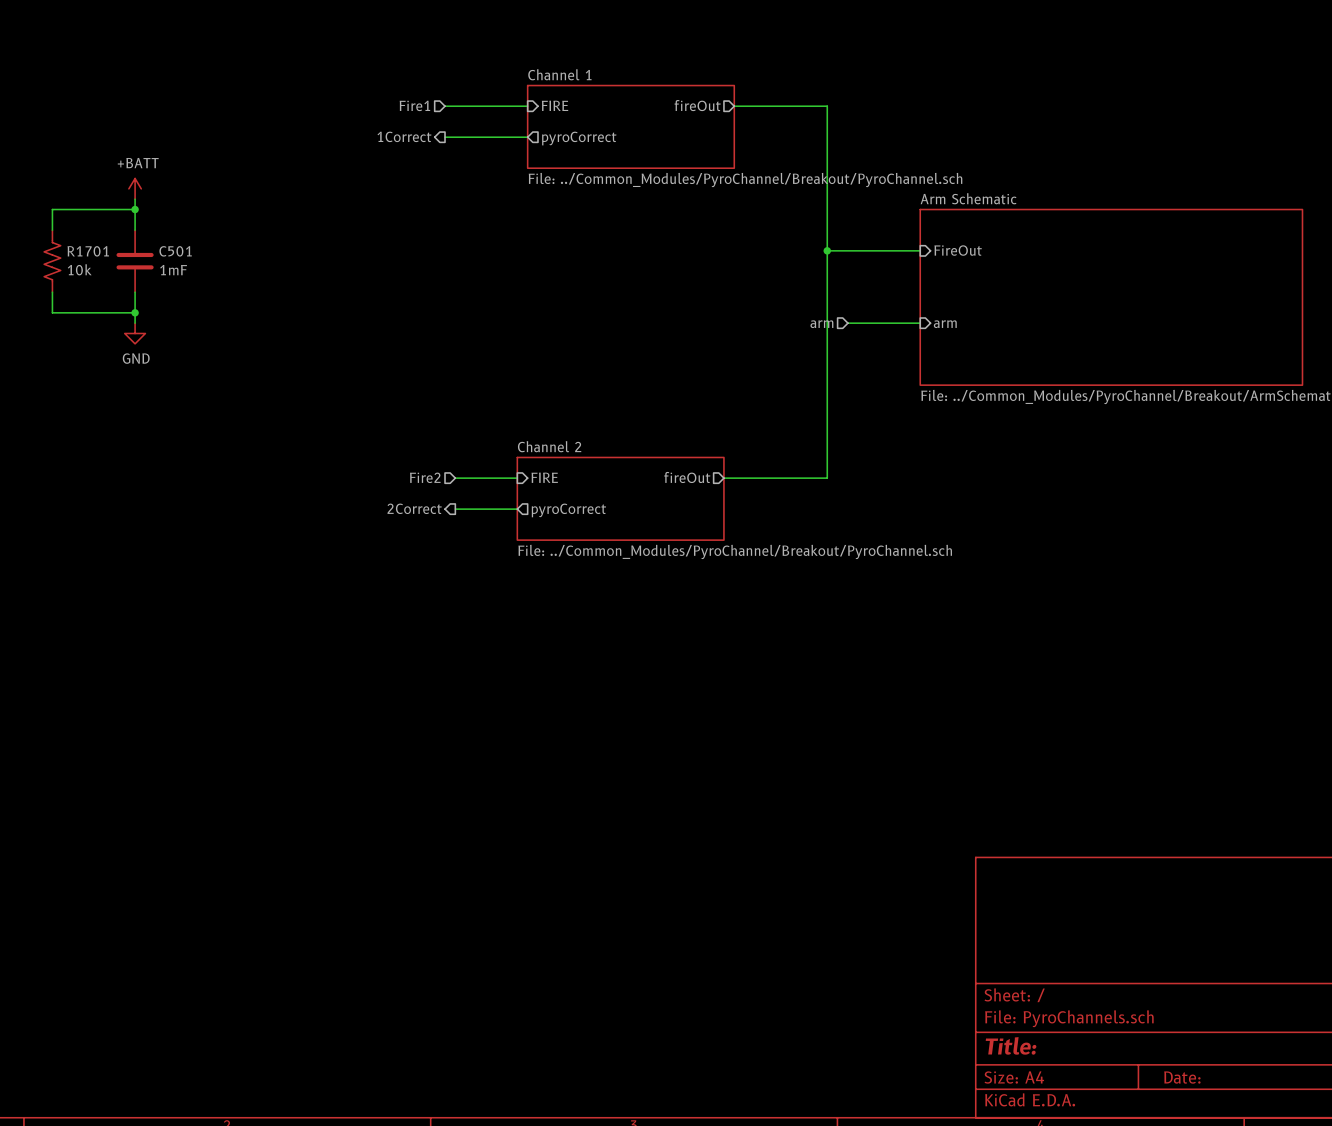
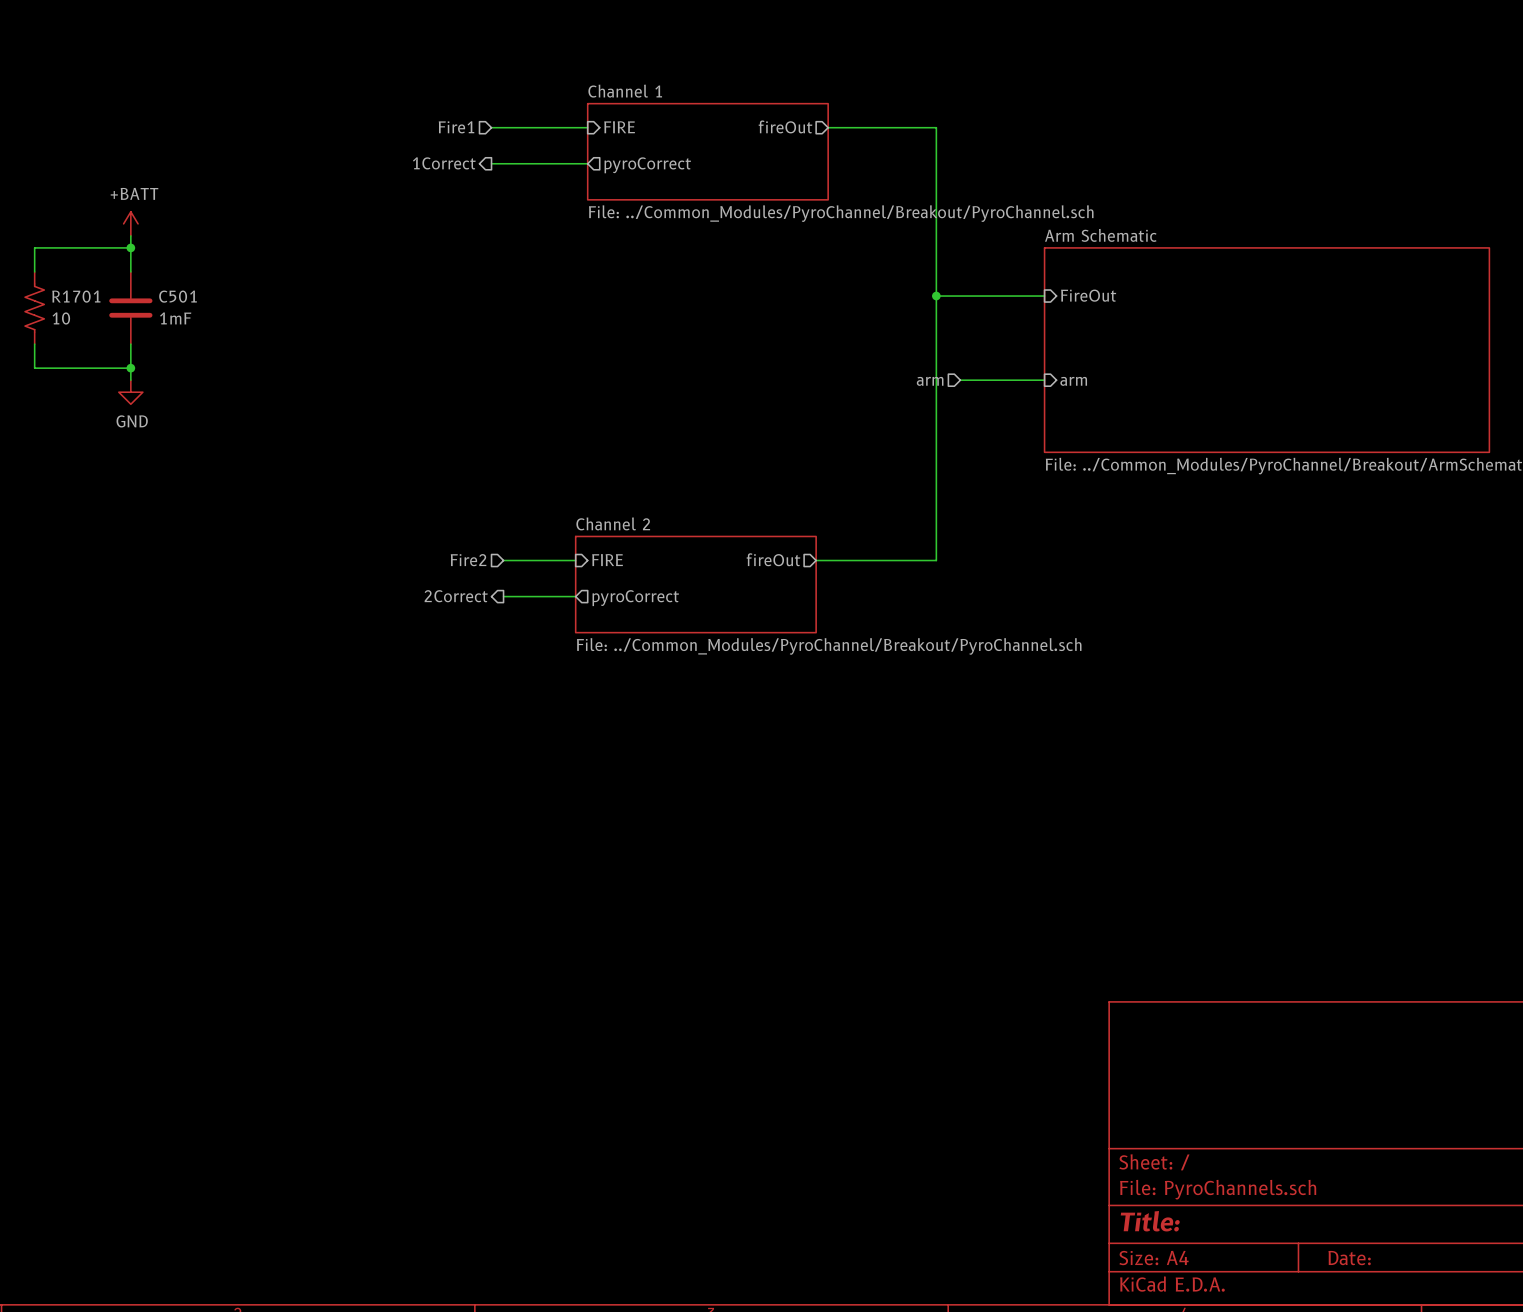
R1701 value: 10k (79, 269) -> 10 (61, 318)

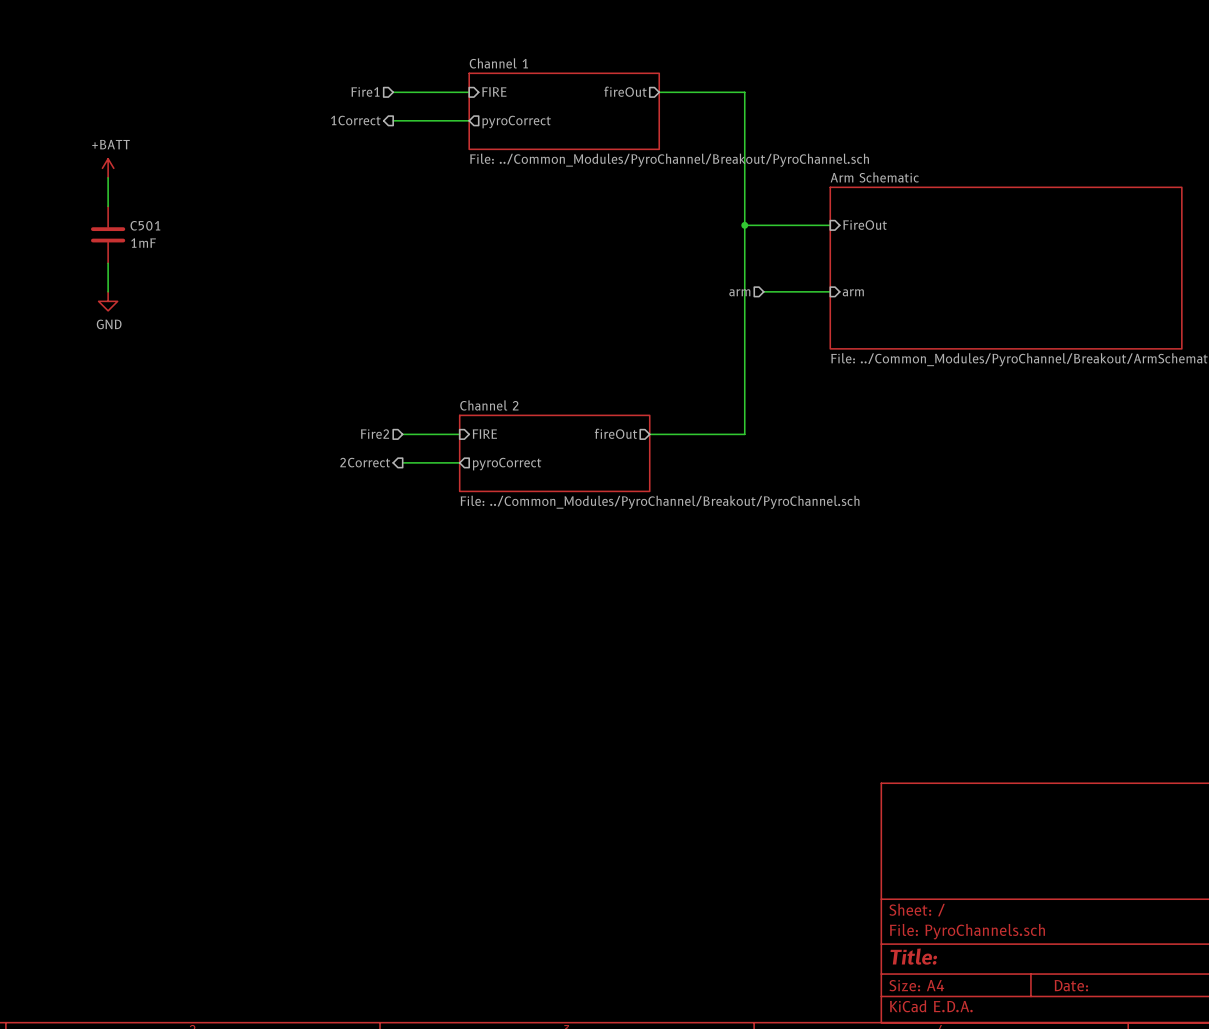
wire: (130, 247) (34, 247) (34, 271) -> none
junction: (130, 247) -> none
R1701: 10 (34, 308) -> none
wire: (34, 344) (34, 368) (130, 368) -> none
junction: (130, 368) -> none

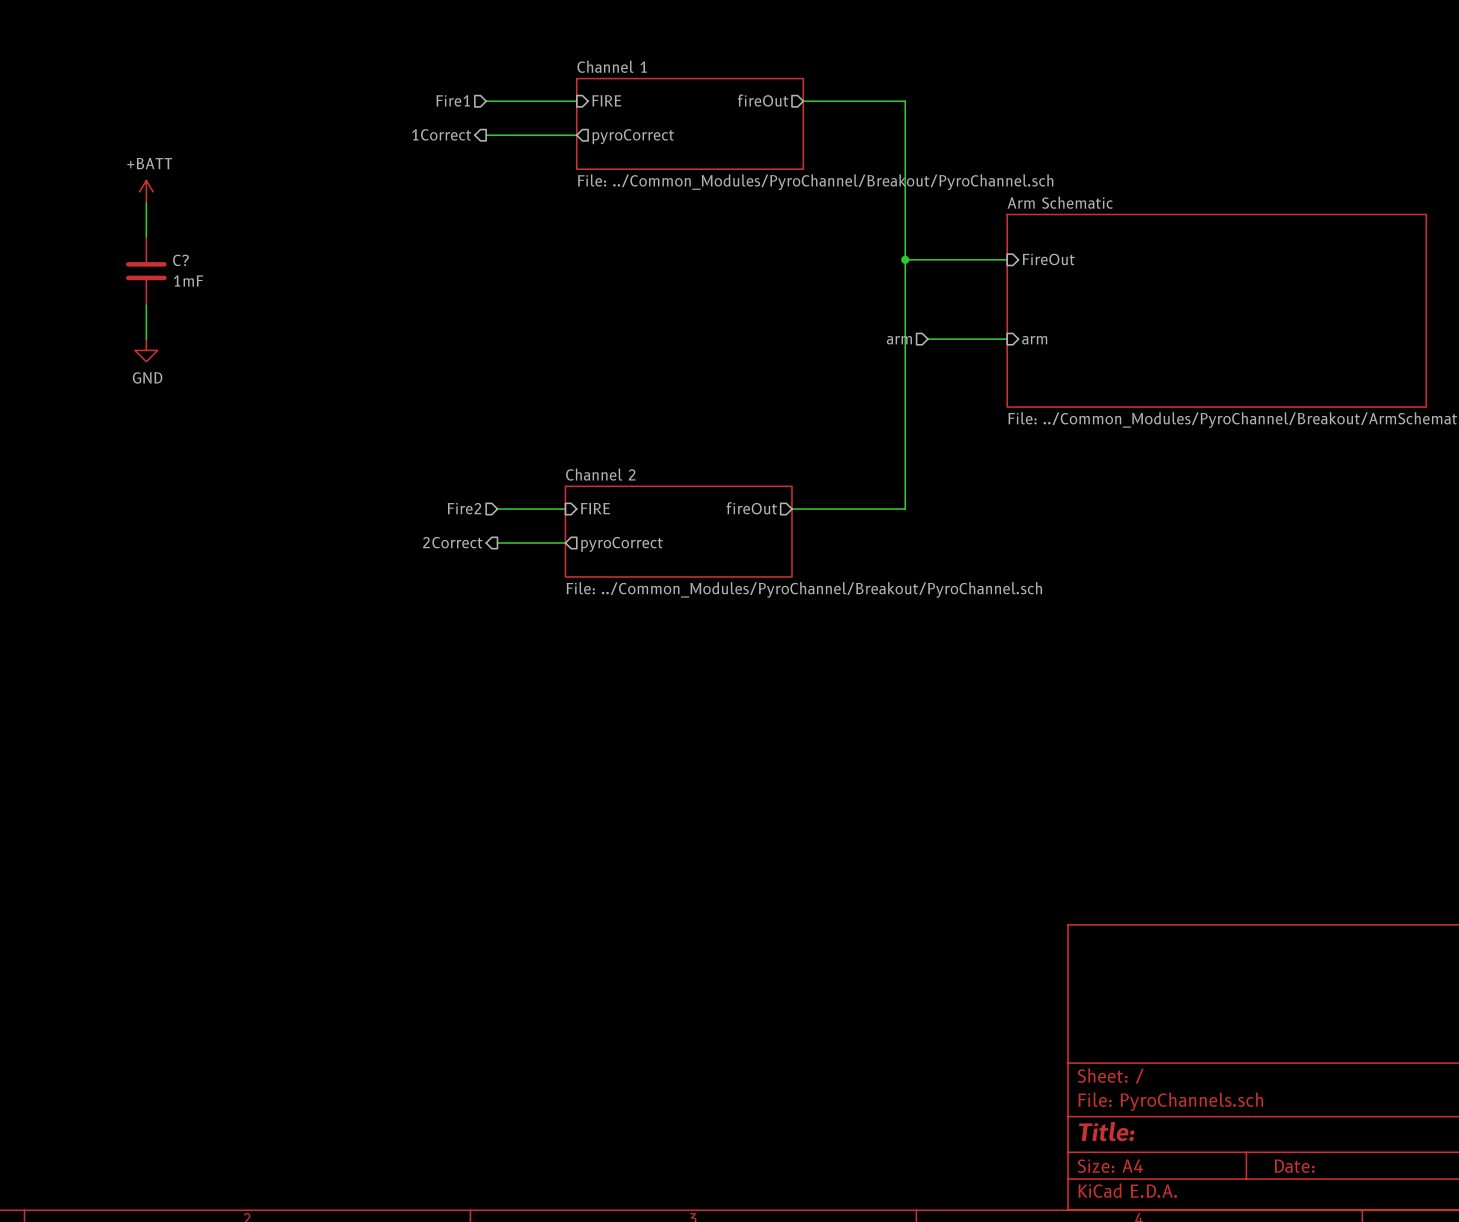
C501 name: C501 (145, 225) -> C? (180, 260)

